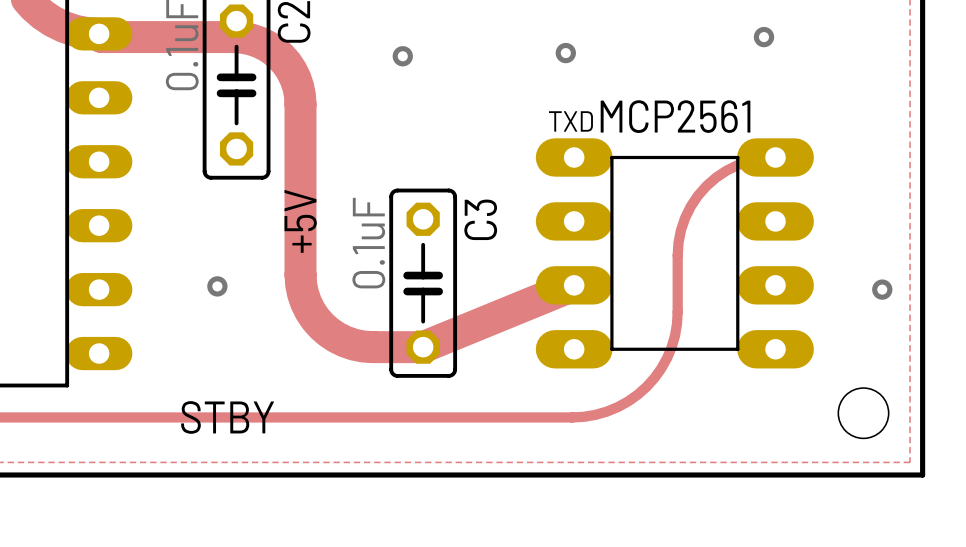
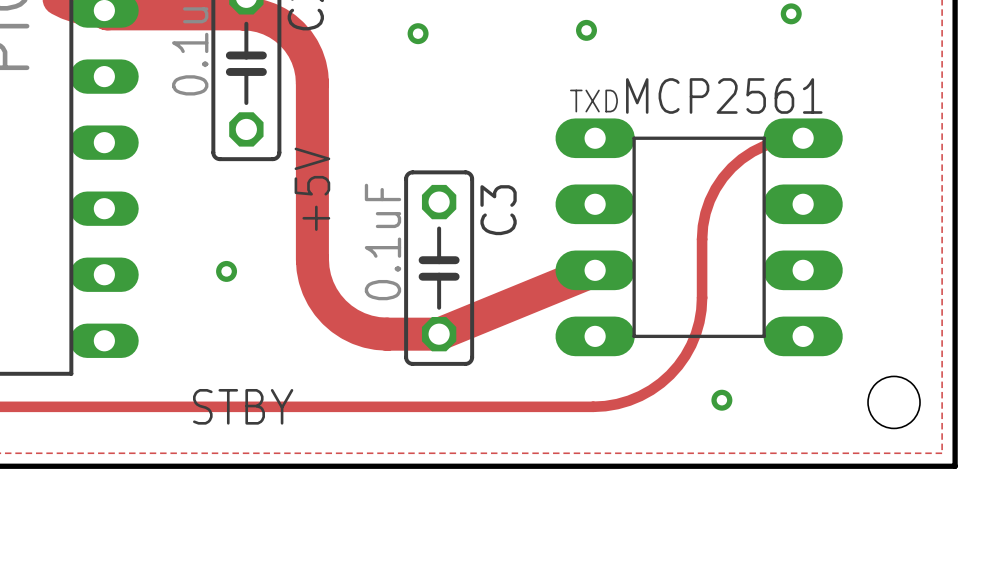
via: (882, 289) -> none
via: none -> (721, 400)

